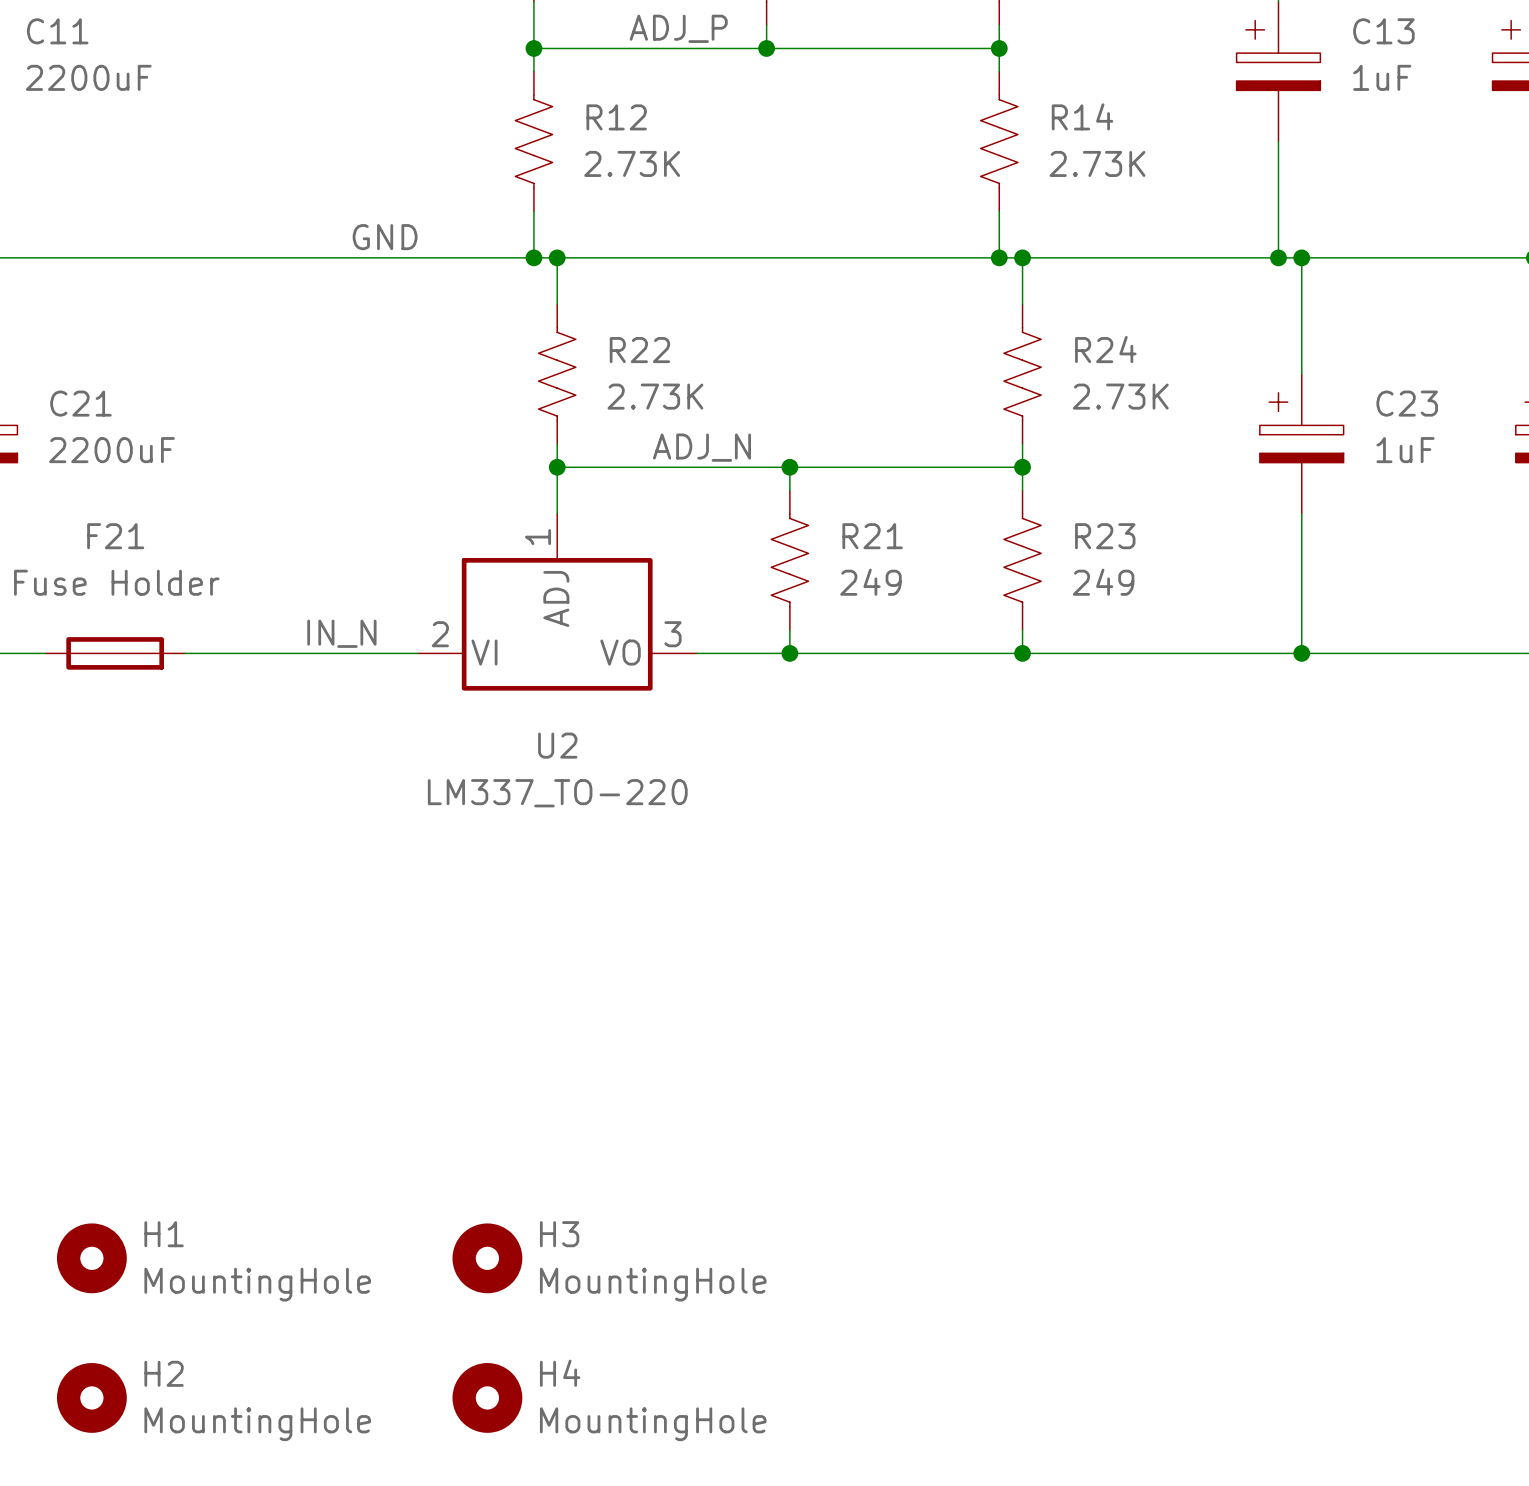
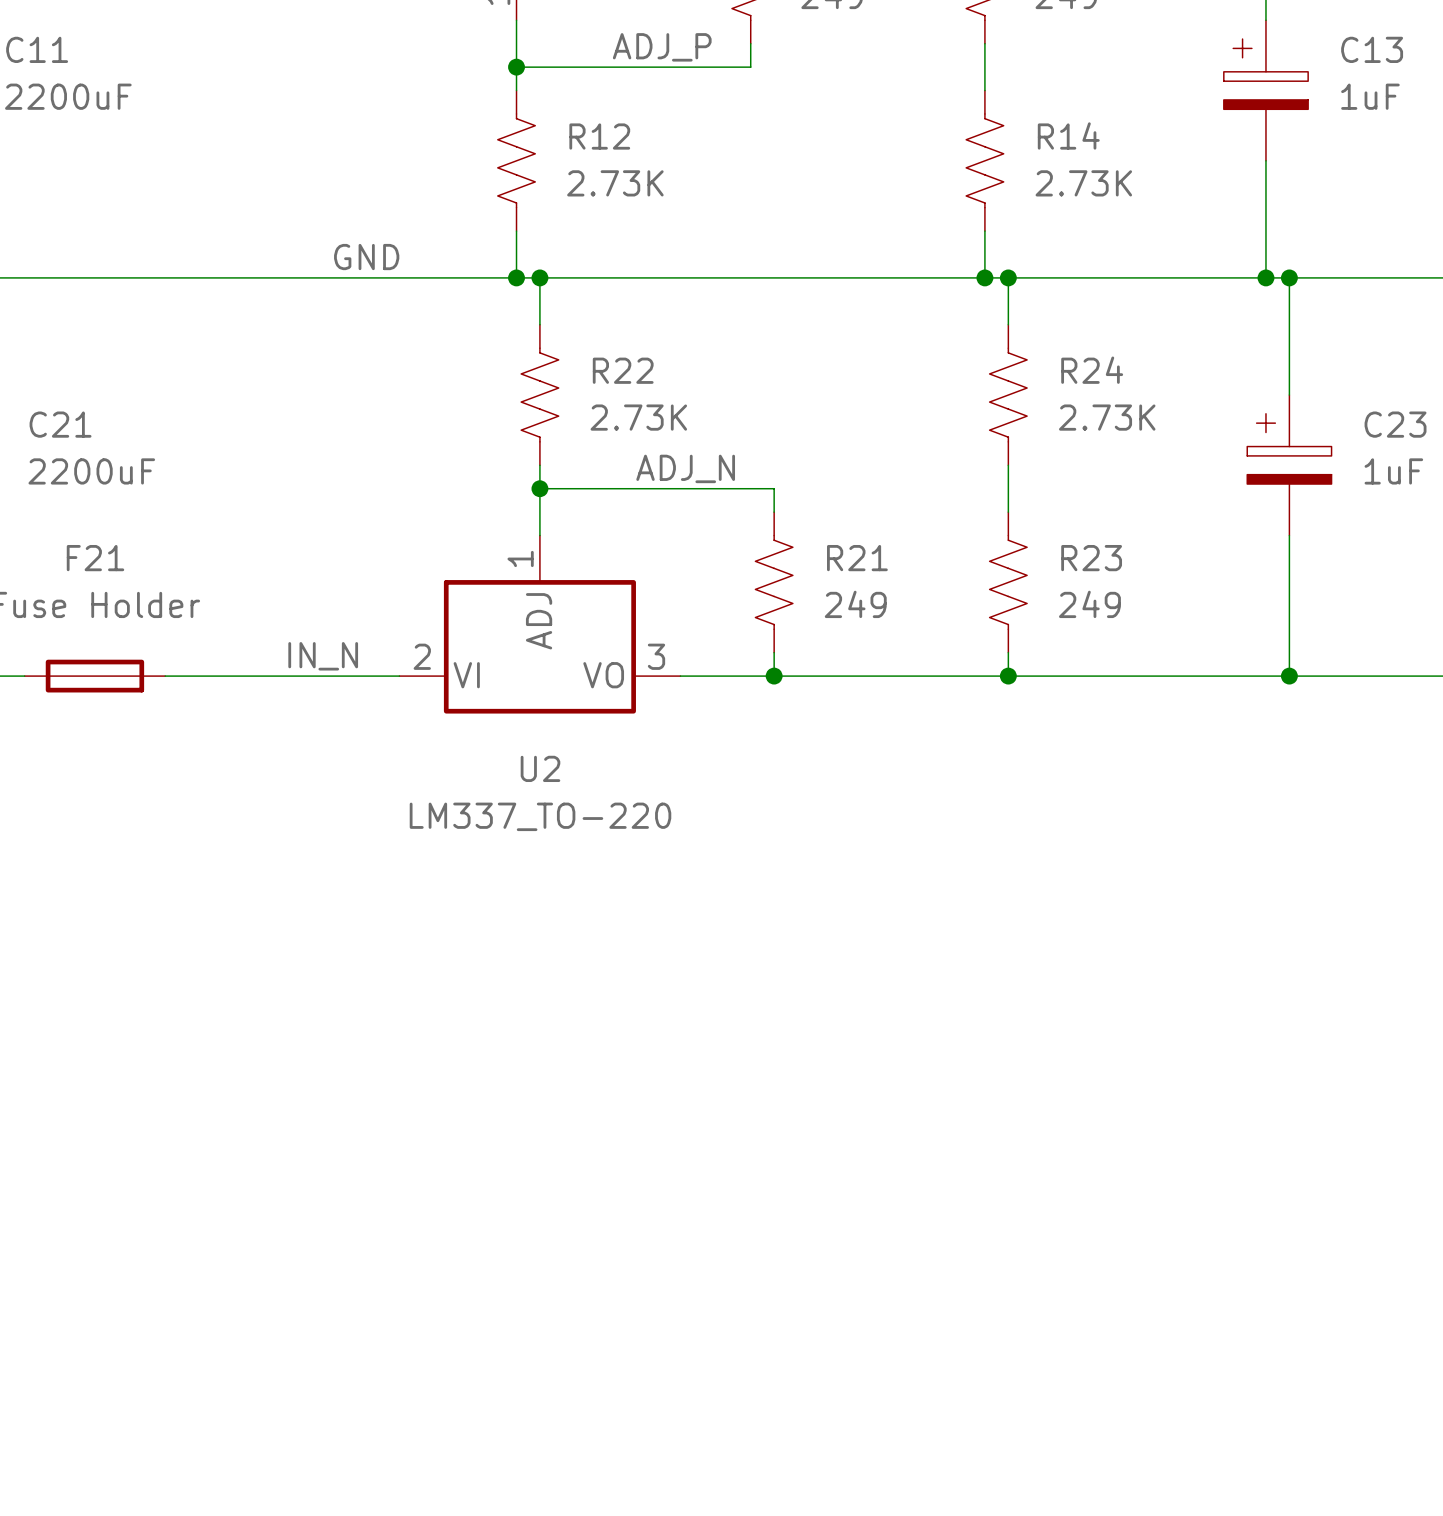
wire: (766, 48) (999, 48) -> none
junction: (766, 48) -> none
junction: (999, 48) -> none
wire: (789, 467) (1022, 467) -> none
junction: (789, 467) -> none
junction: (1022, 467) -> none
H1: MountingHole (91, 1258) -> none
H3: MountingHole (487, 1258) -> none
H2: MountingHole (91, 1397) -> none
H4: MountingHole (487, 1397) -> none

